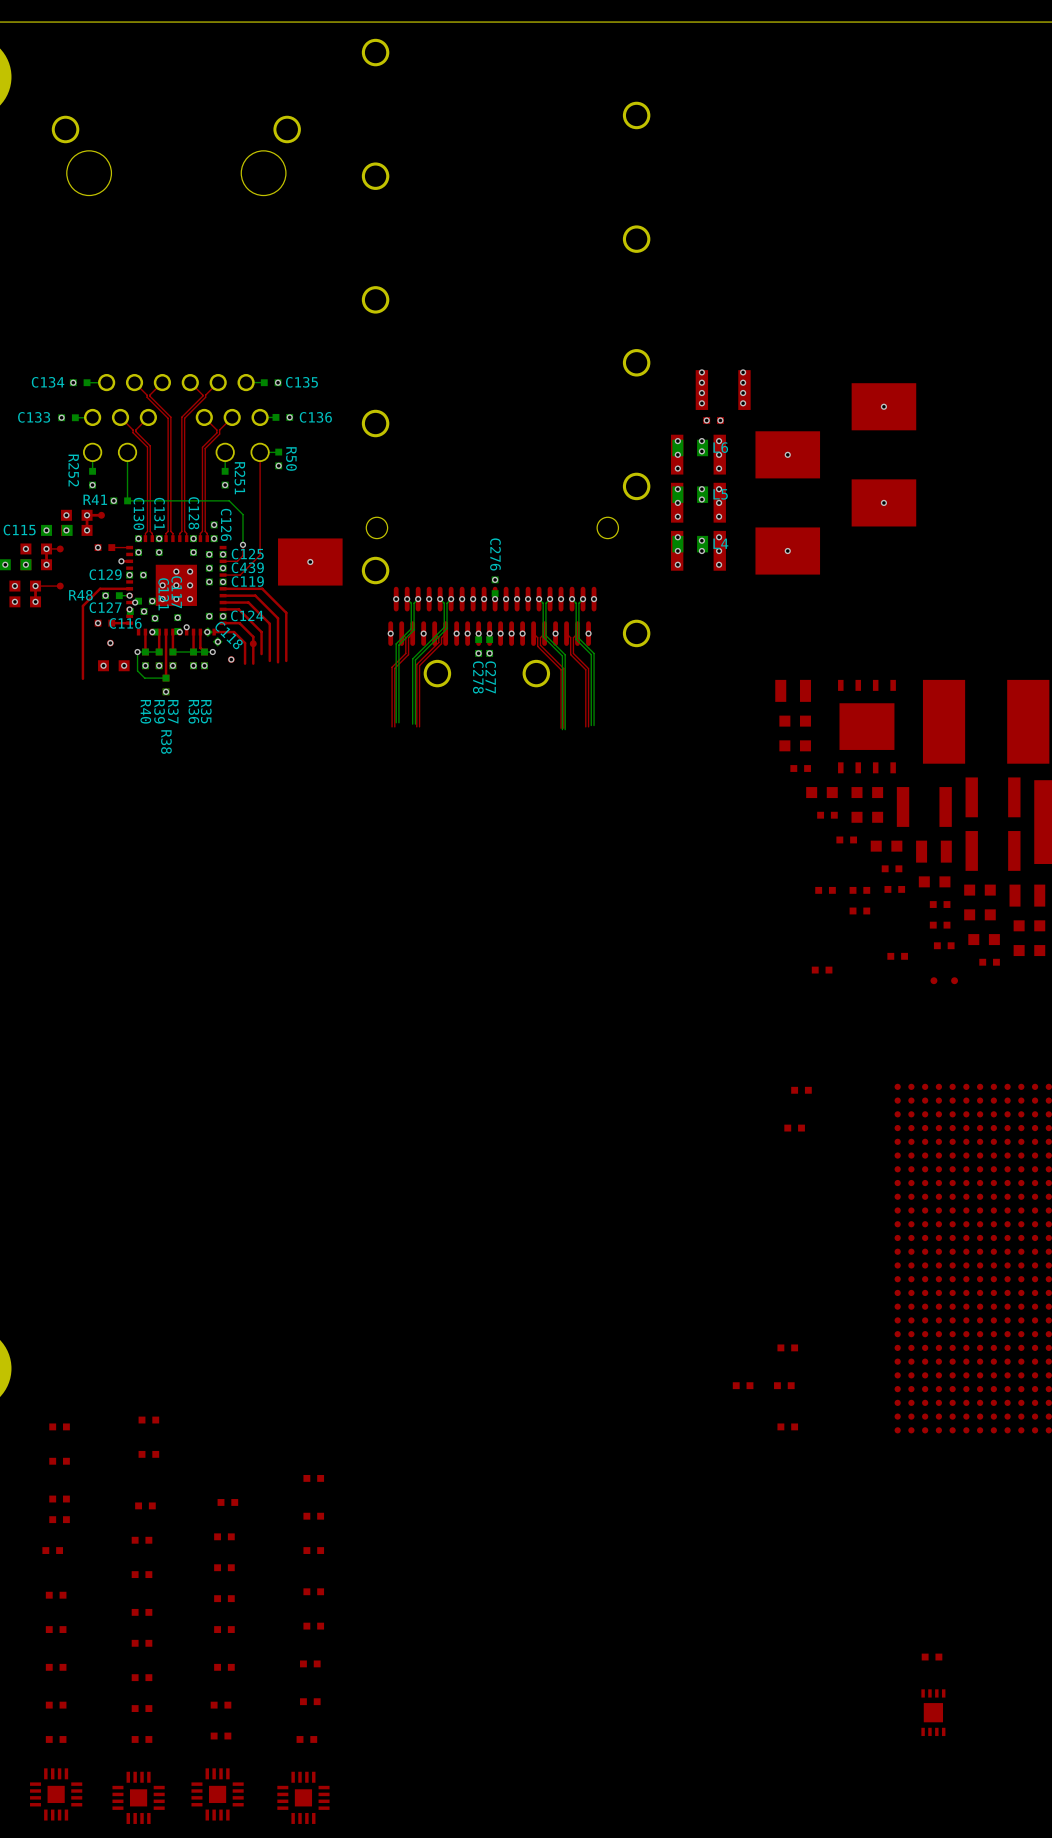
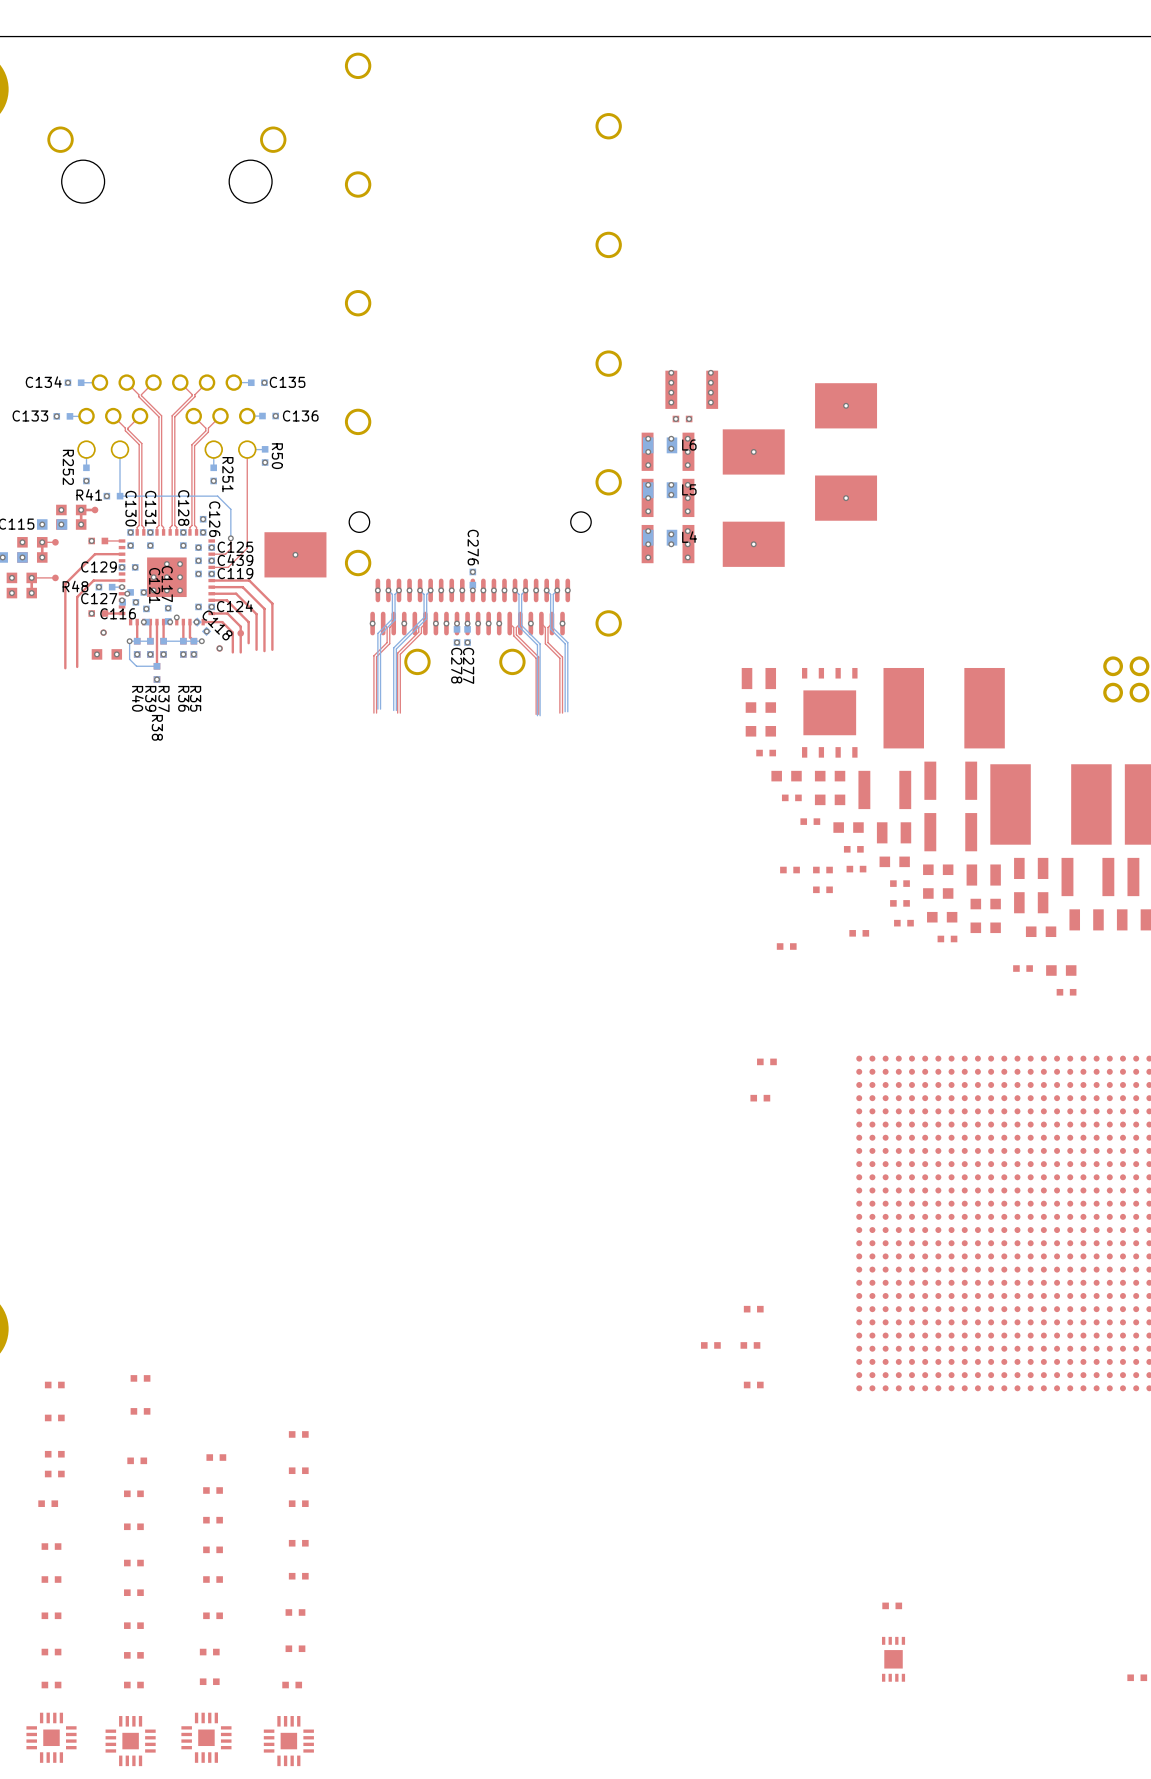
top track: none -> (114, 554) (95, 554) (65, 583) (65, 668)
via: (121, 561) -> none
part: (933, 980) -> none
part: (954, 980) -> none

